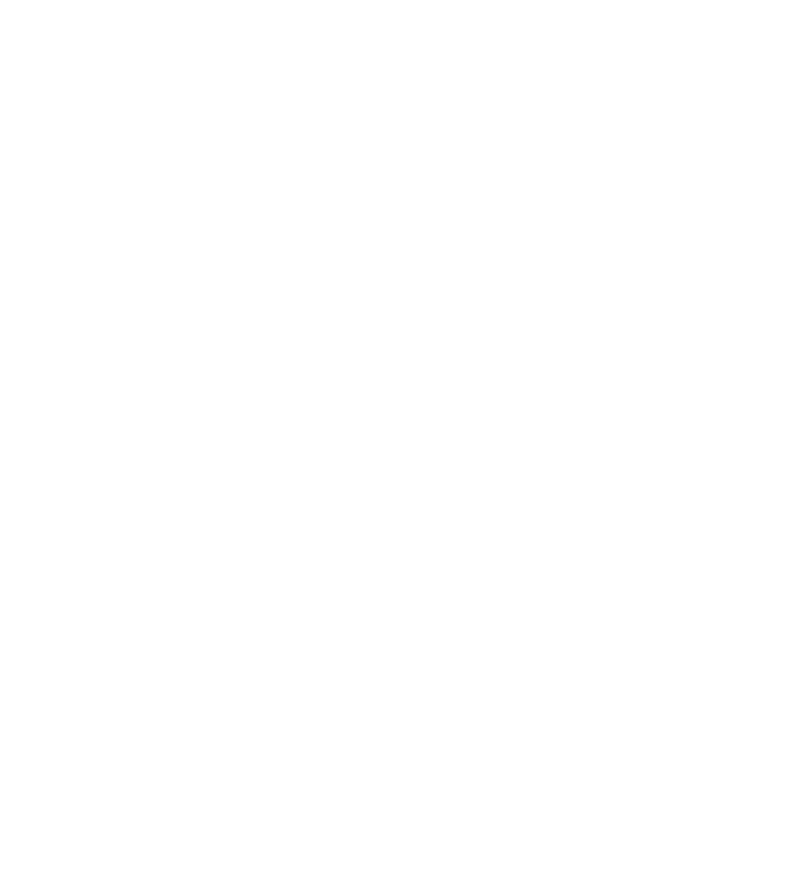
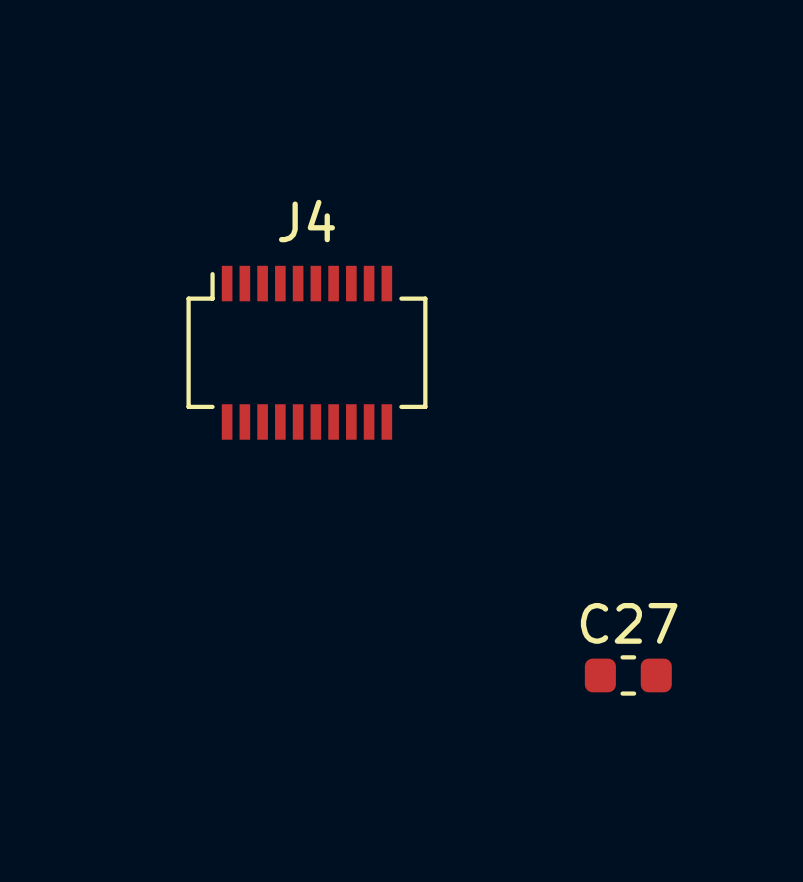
J4: none -> (306, 352)
C27: none -> (628, 675)

